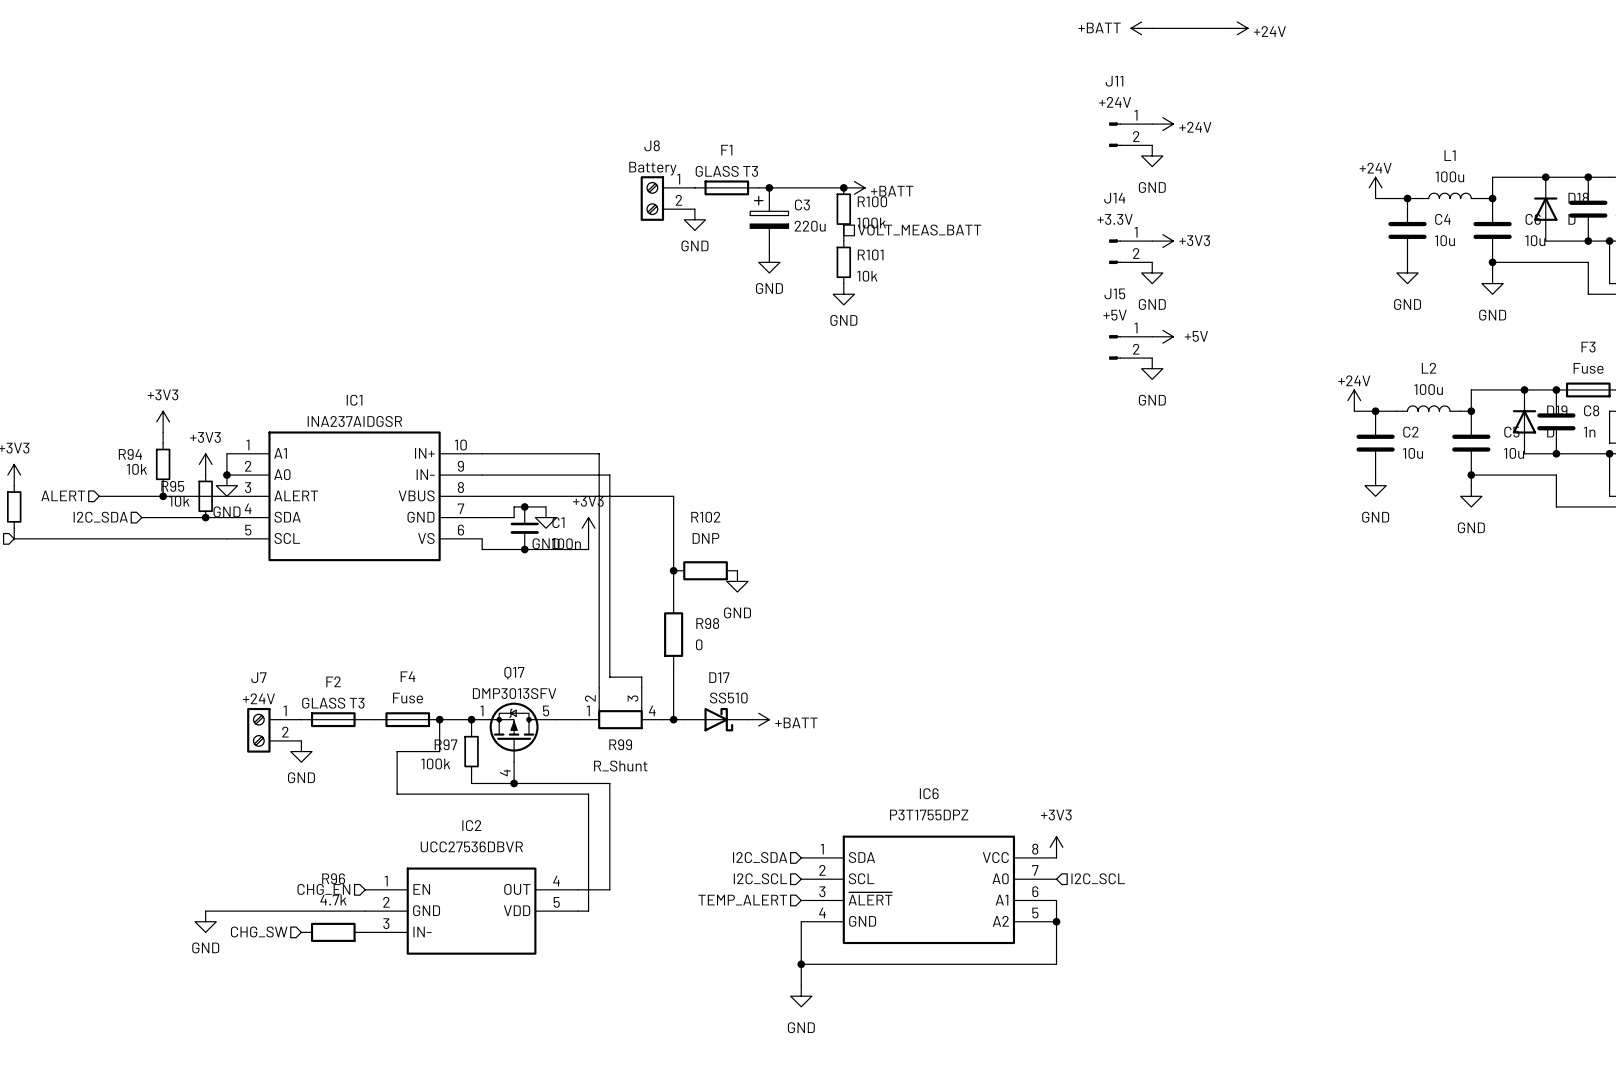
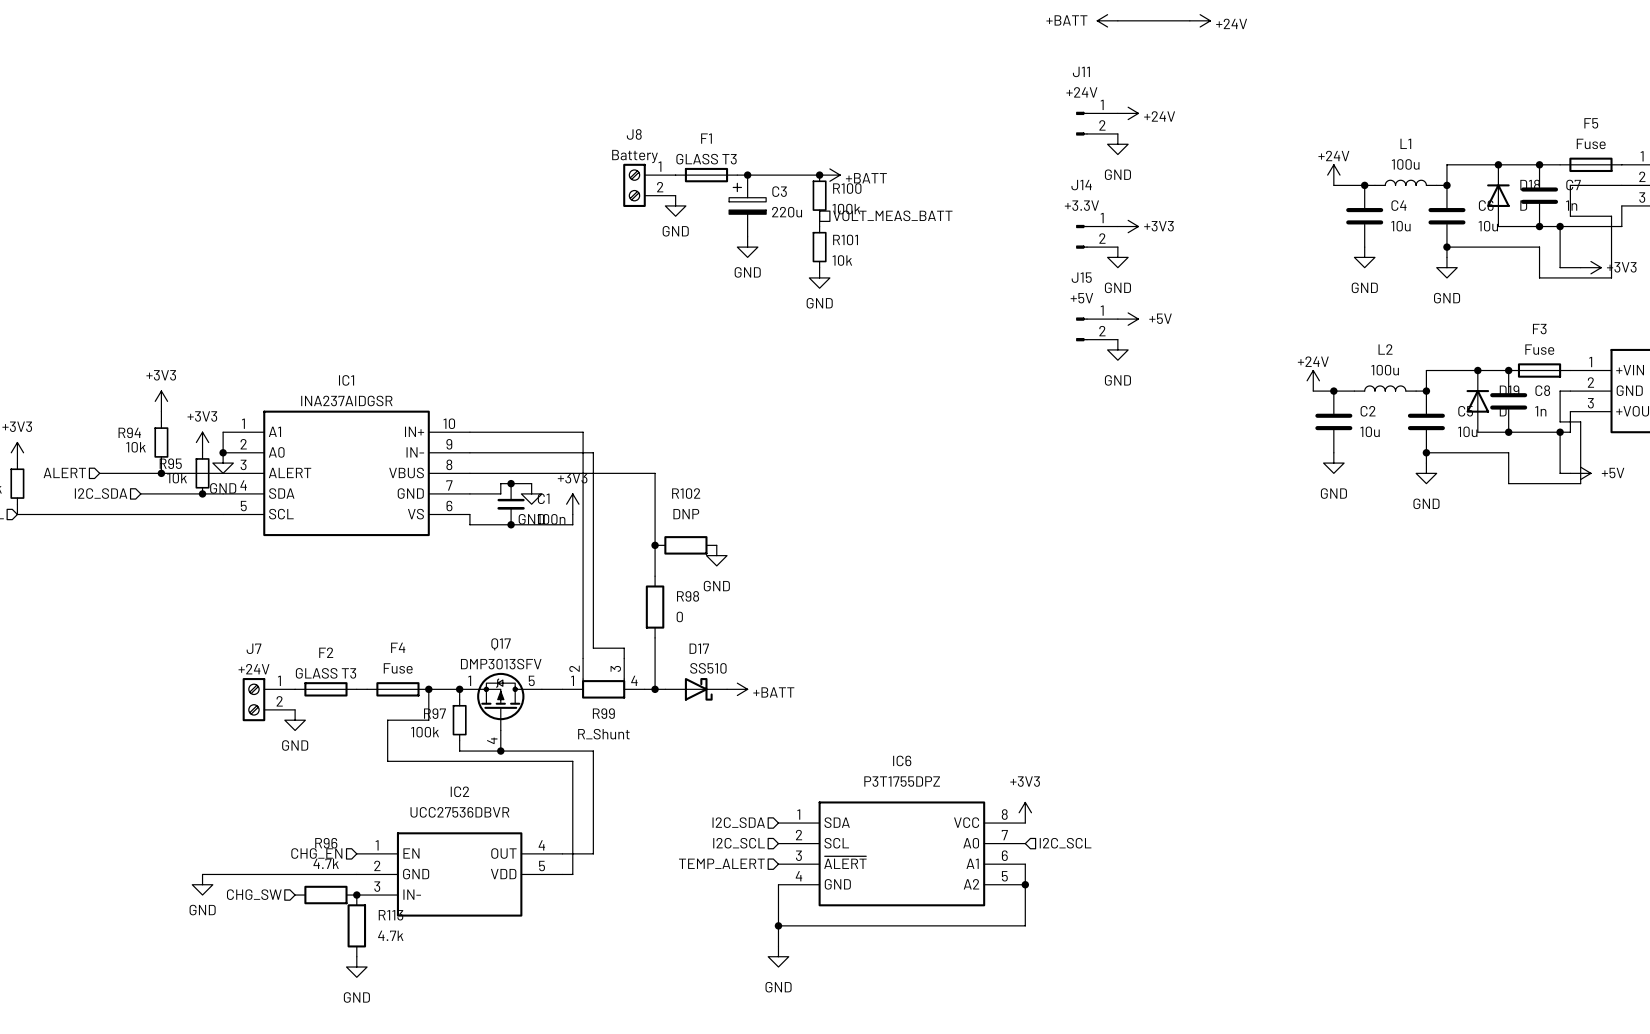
junction: none -> (356, 895)
R113: none -> 4.7k (356, 925)
power symbol: none -> GND (356, 967)

